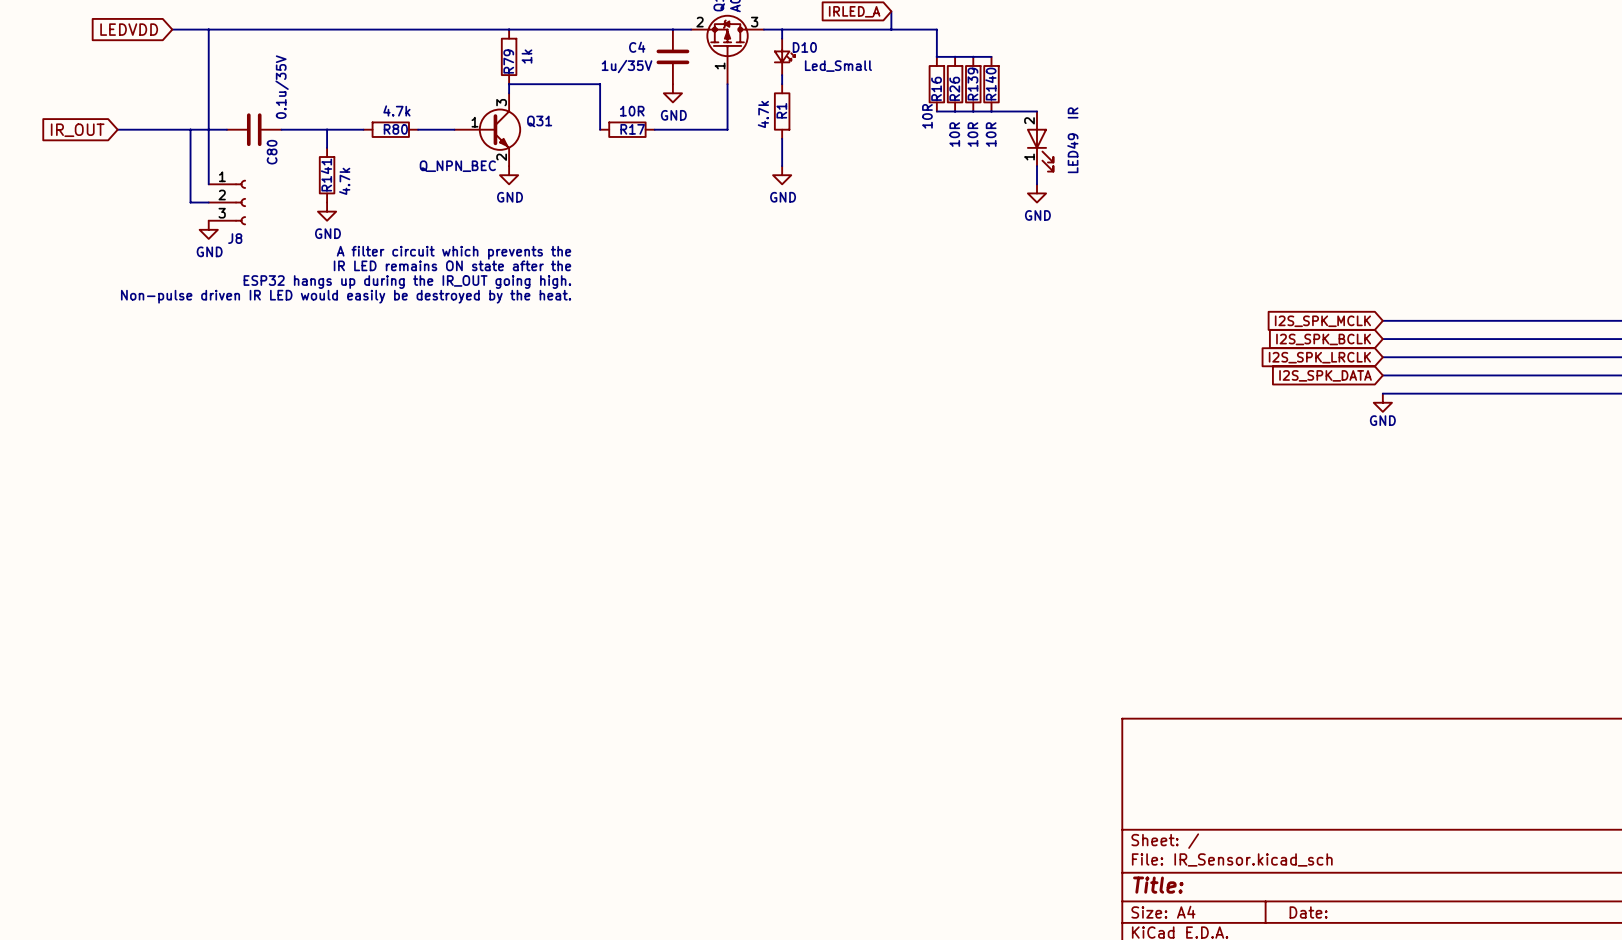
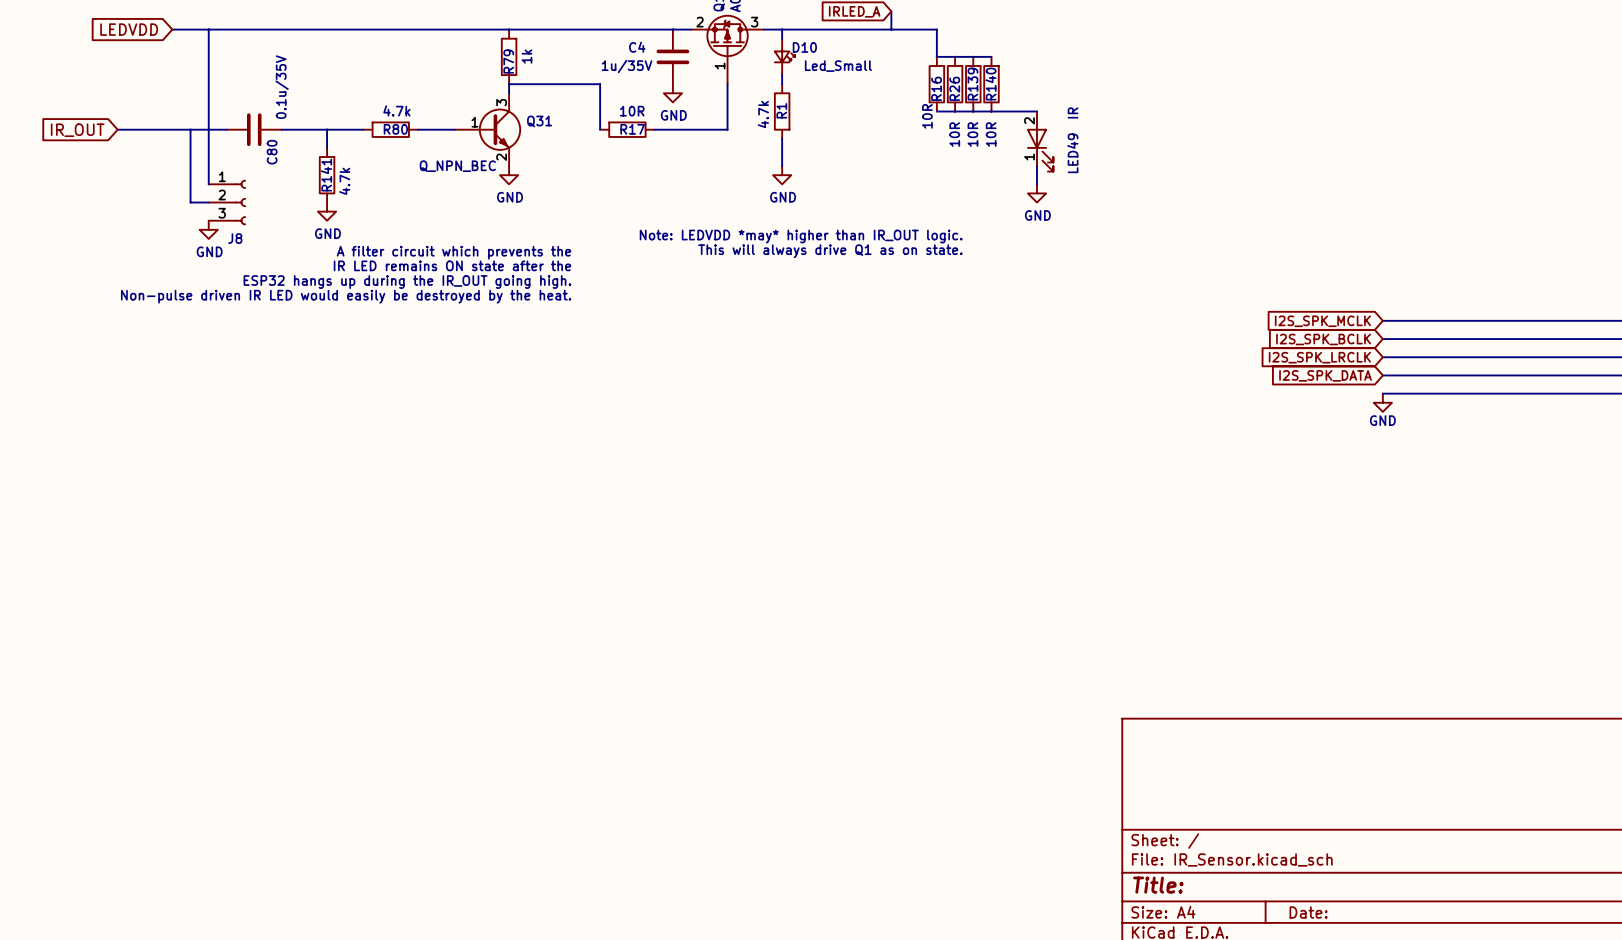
text: none -> Note: LEDVDD *may* higher than IR_OUT logic. (801, 236)
text: none -> This will always drive Q1 as on state. (830, 251)

